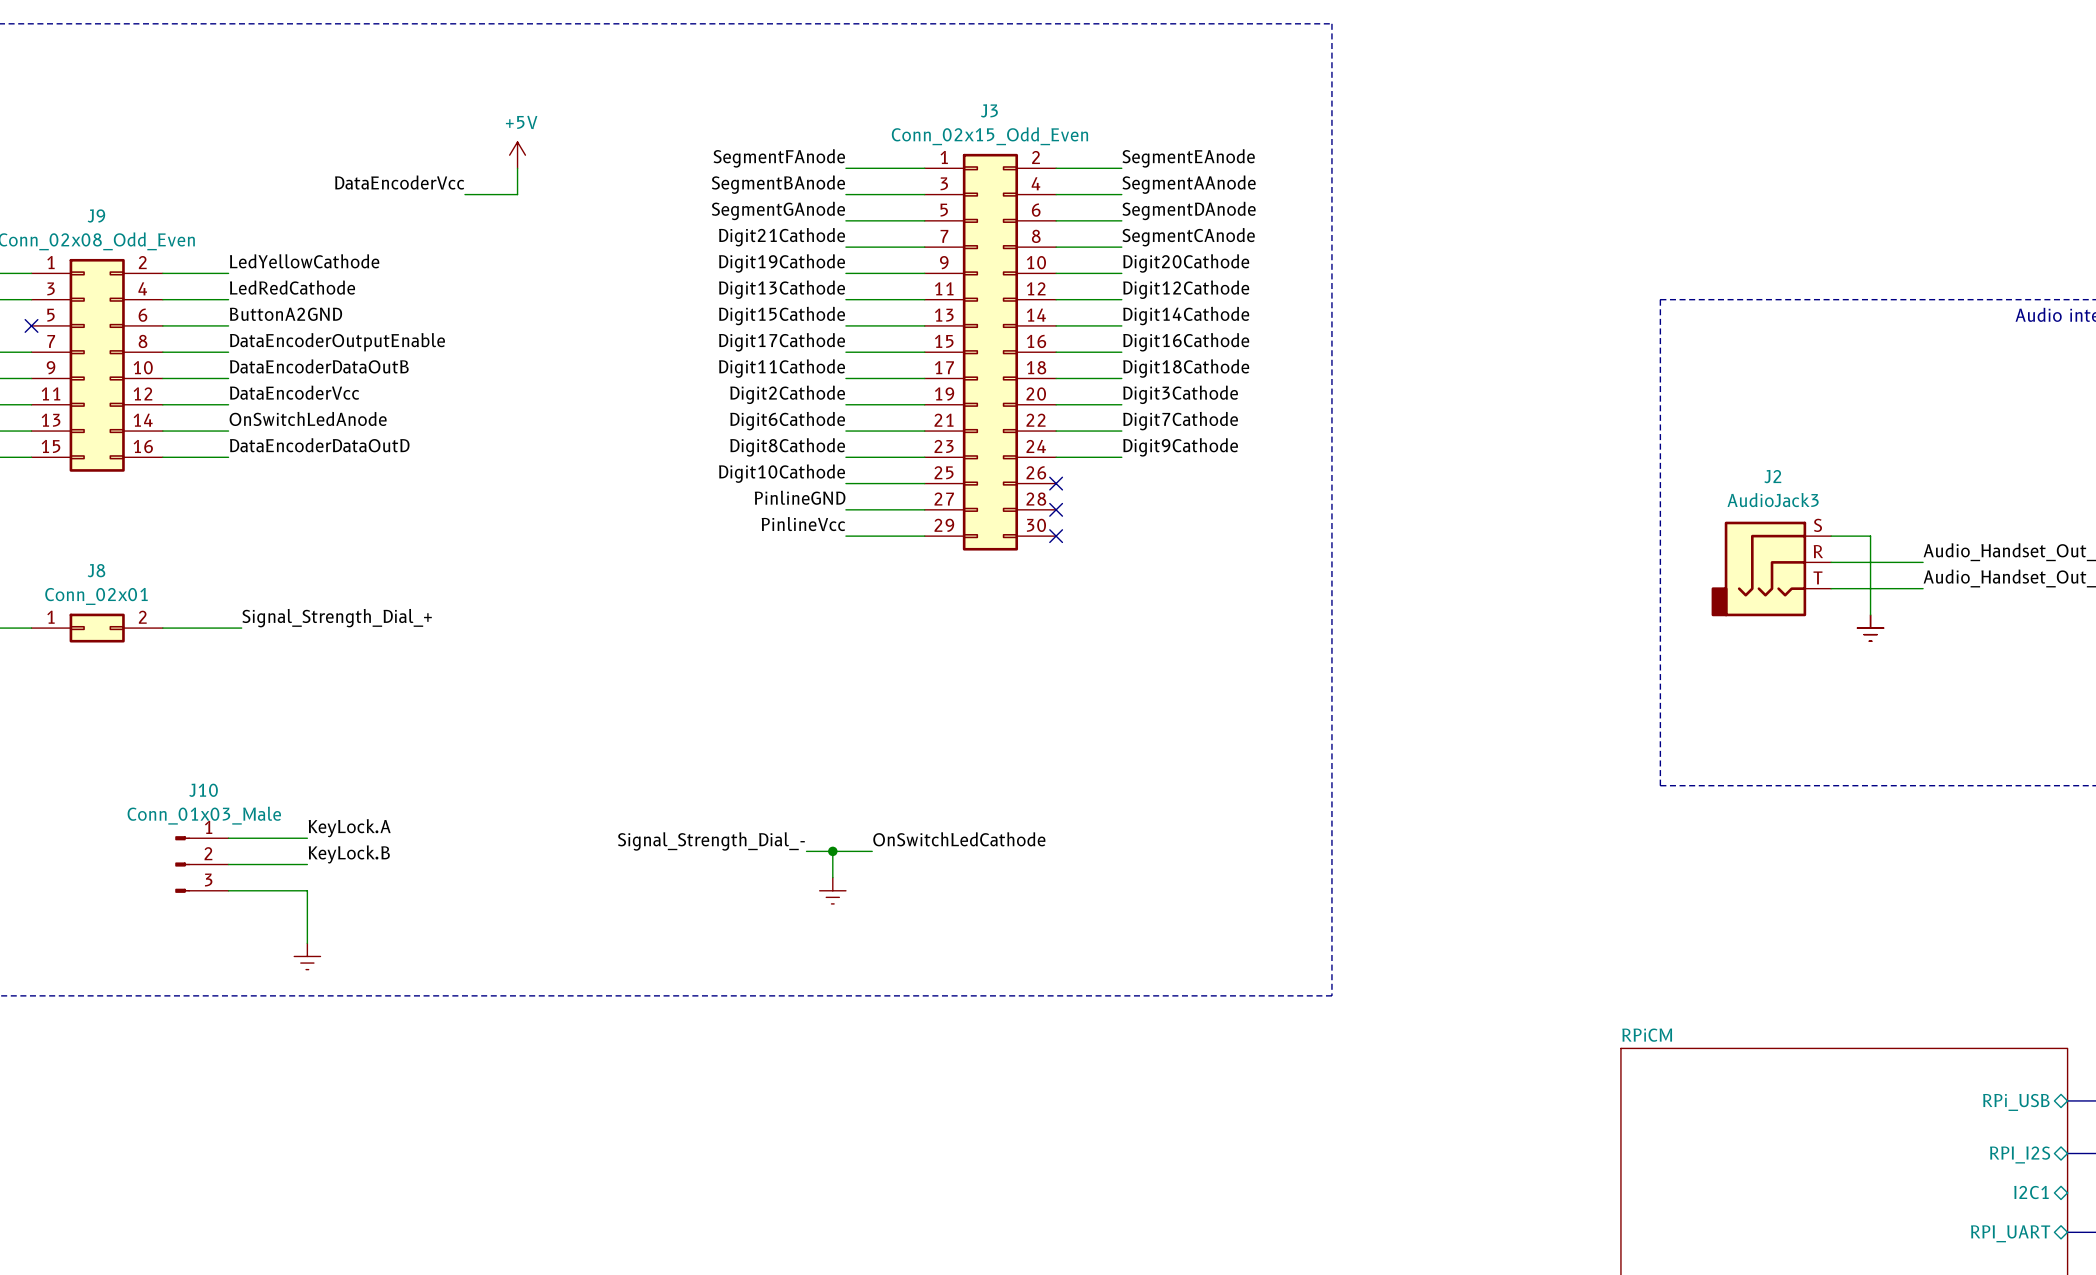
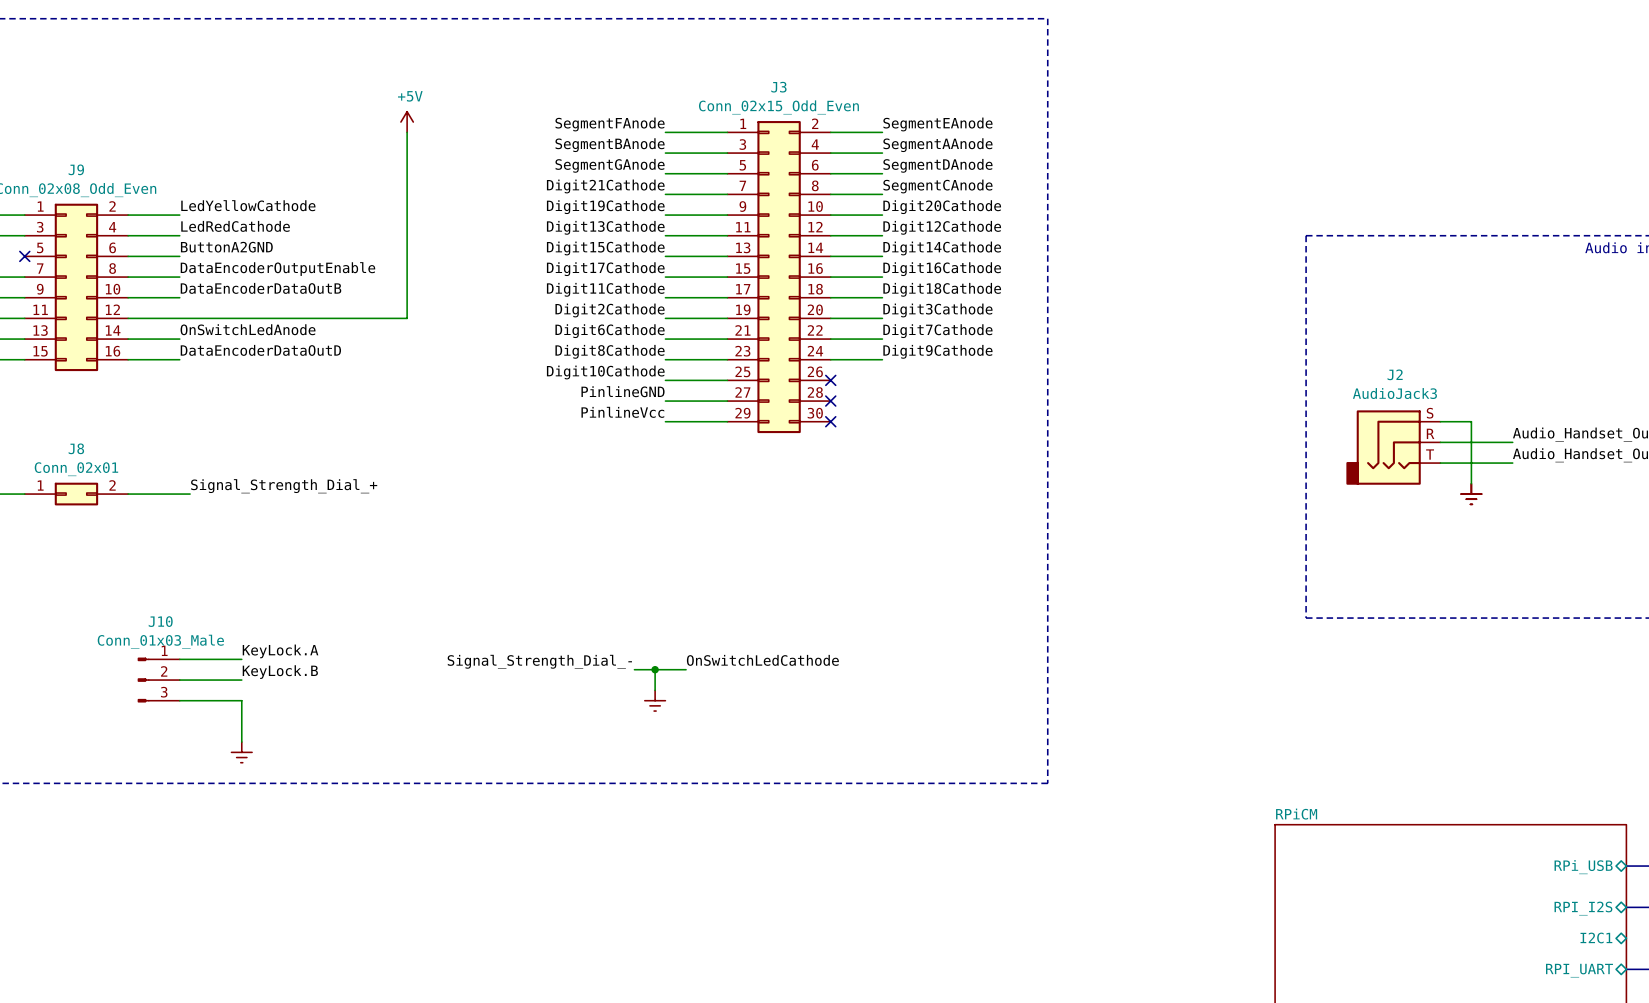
label: DataEncoderVcc (399, 182) -> none
wire: (465, 194) (517, 194) -> (179, 318) (407, 318) (407, 153)
label: DataEncoderVcc (294, 392) -> none

